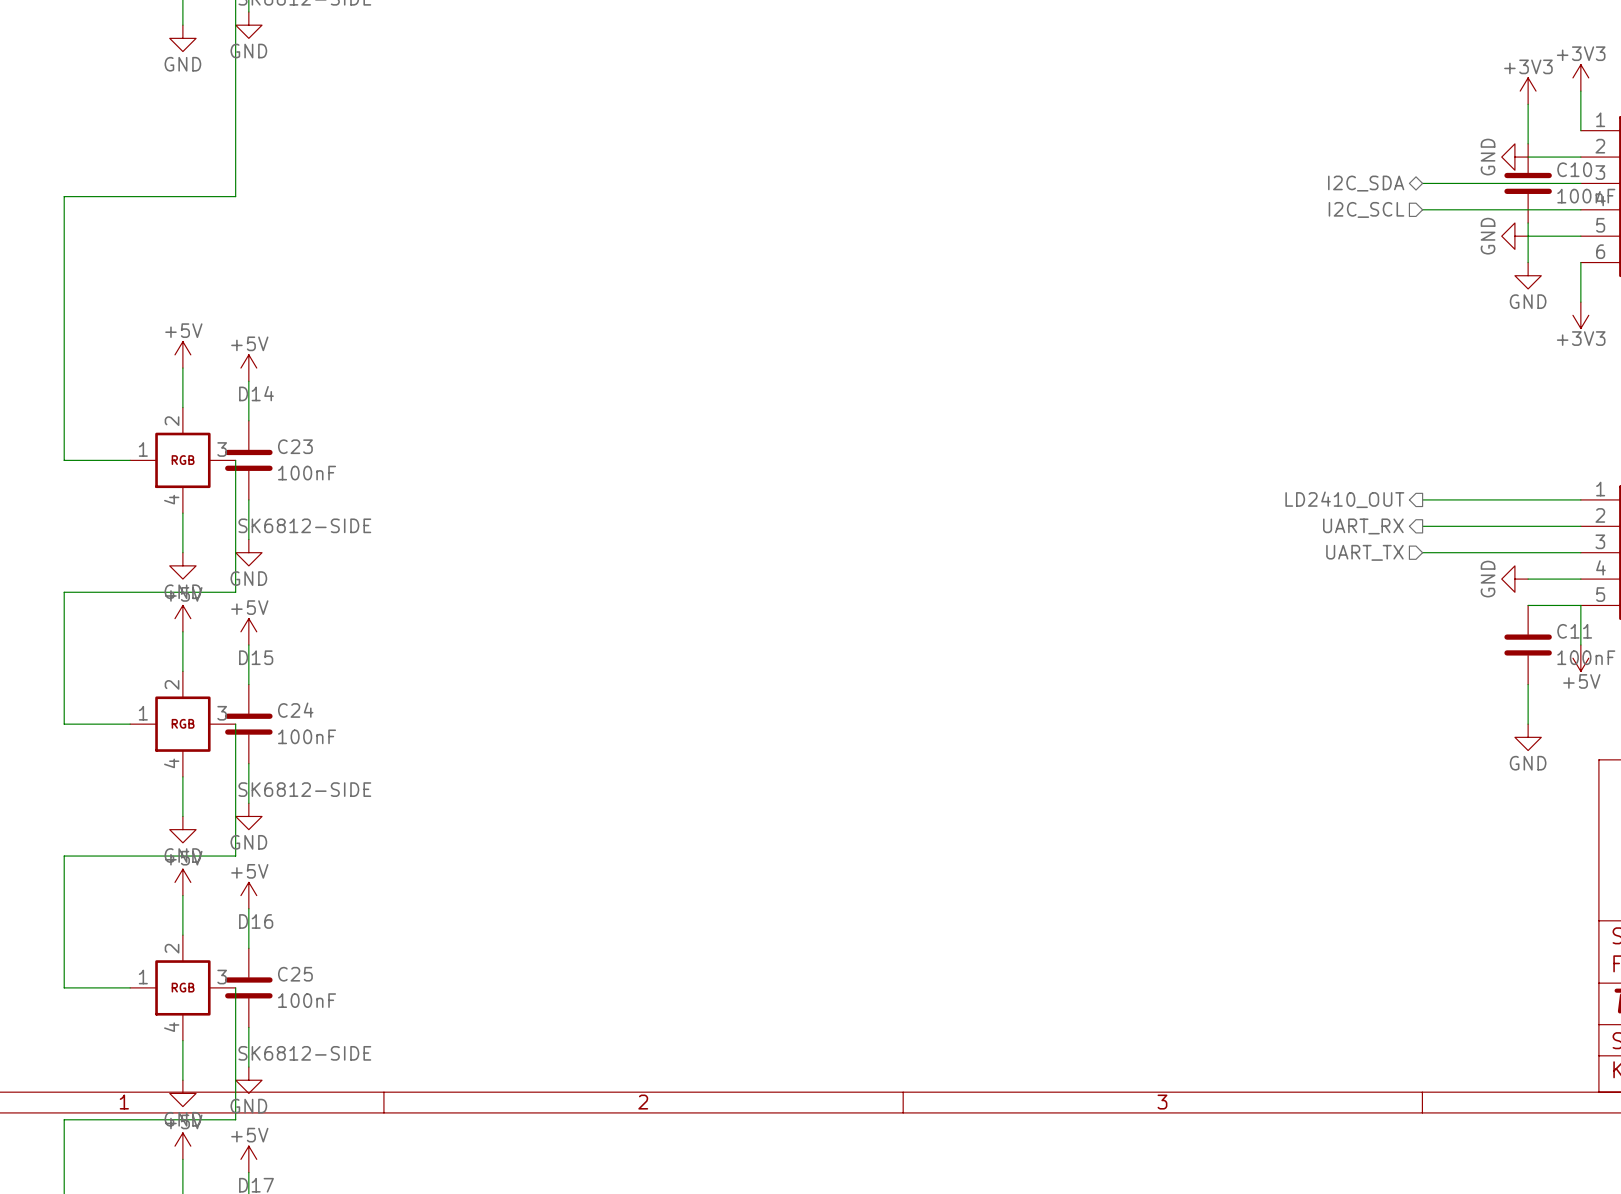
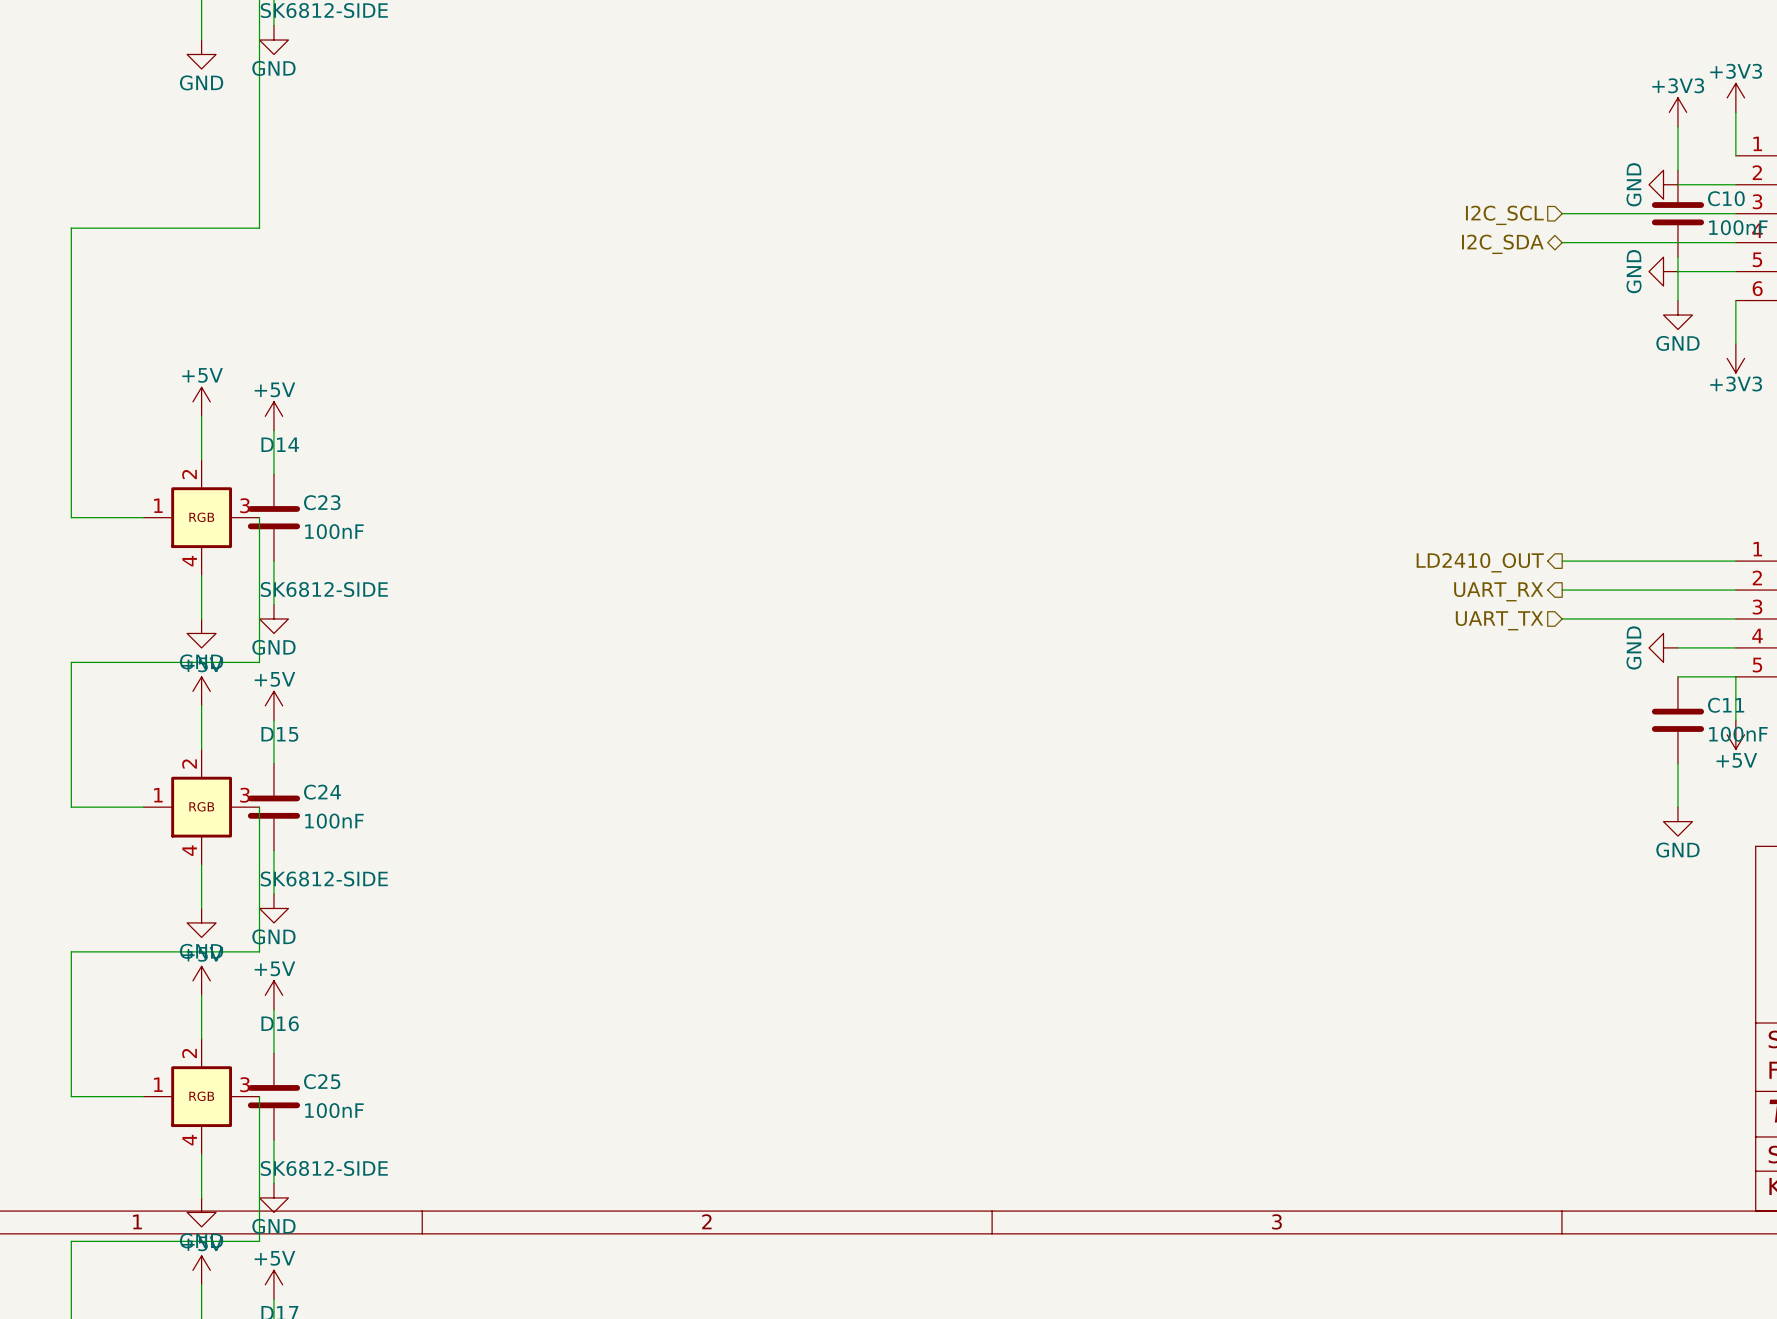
hierarchical label shape: bidirectional (1366, 183) -> input (1504, 215)
hierarchical label: I2C_SDA (1366, 183) -> I2C_SCL (1504, 215)
hierarchical label shape: input (1366, 209) -> bidirectional (1502, 244)
hierarchical label: I2C_SCL (1366, 209) -> I2C_SDA (1502, 244)

